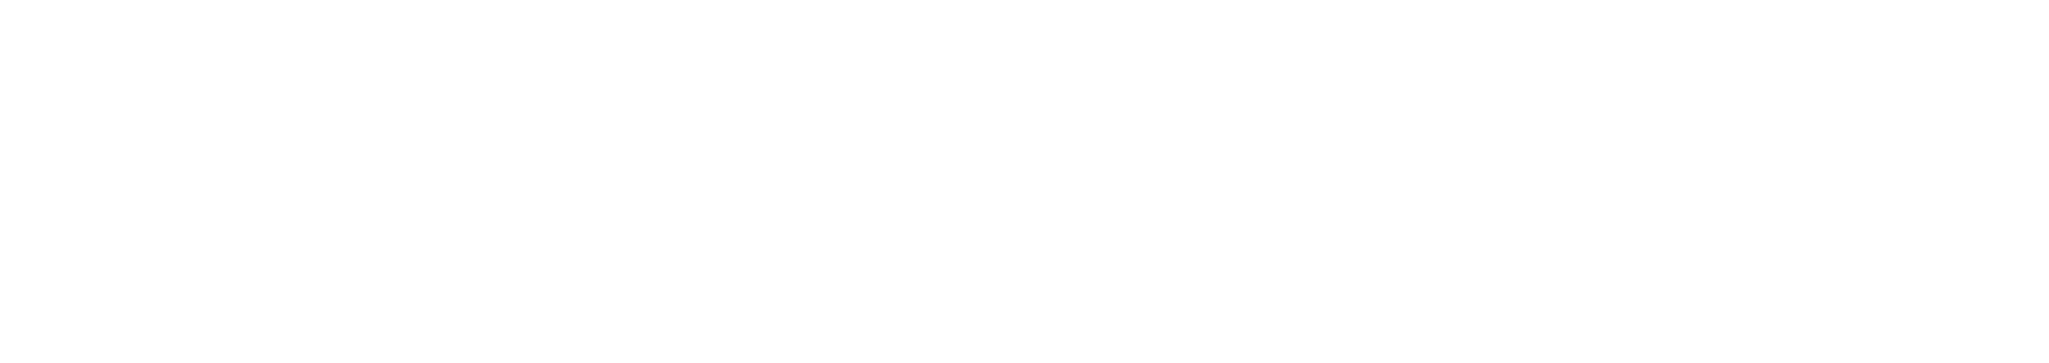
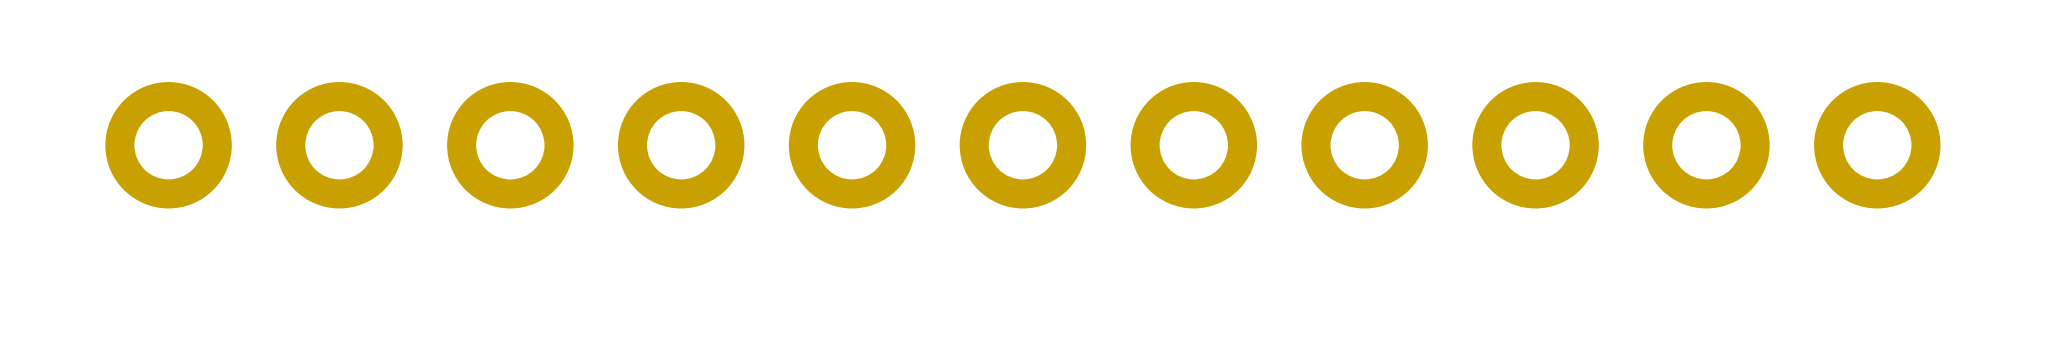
part: none -> (1022, 145)

